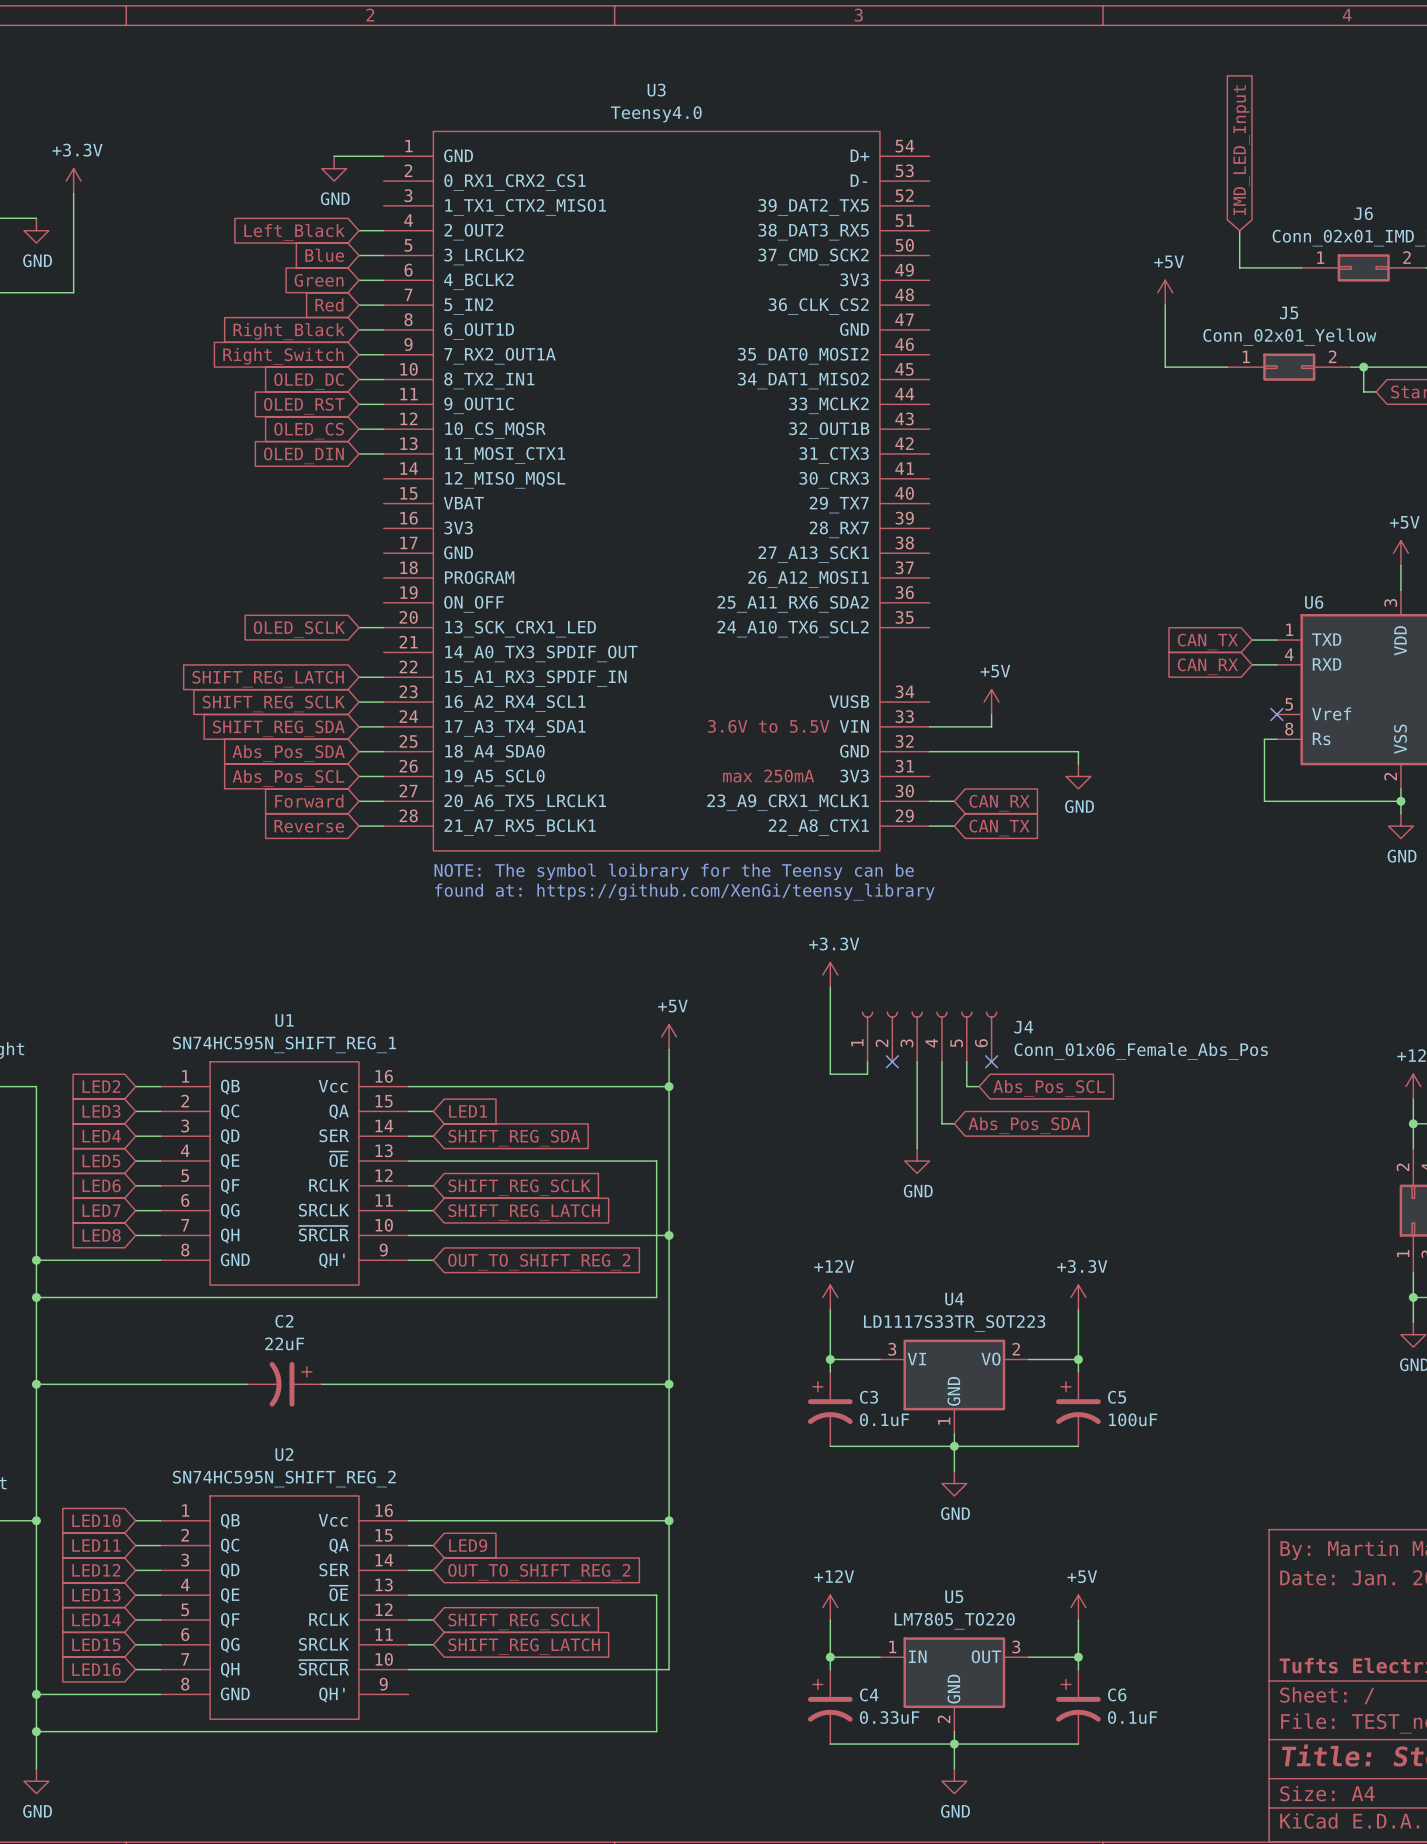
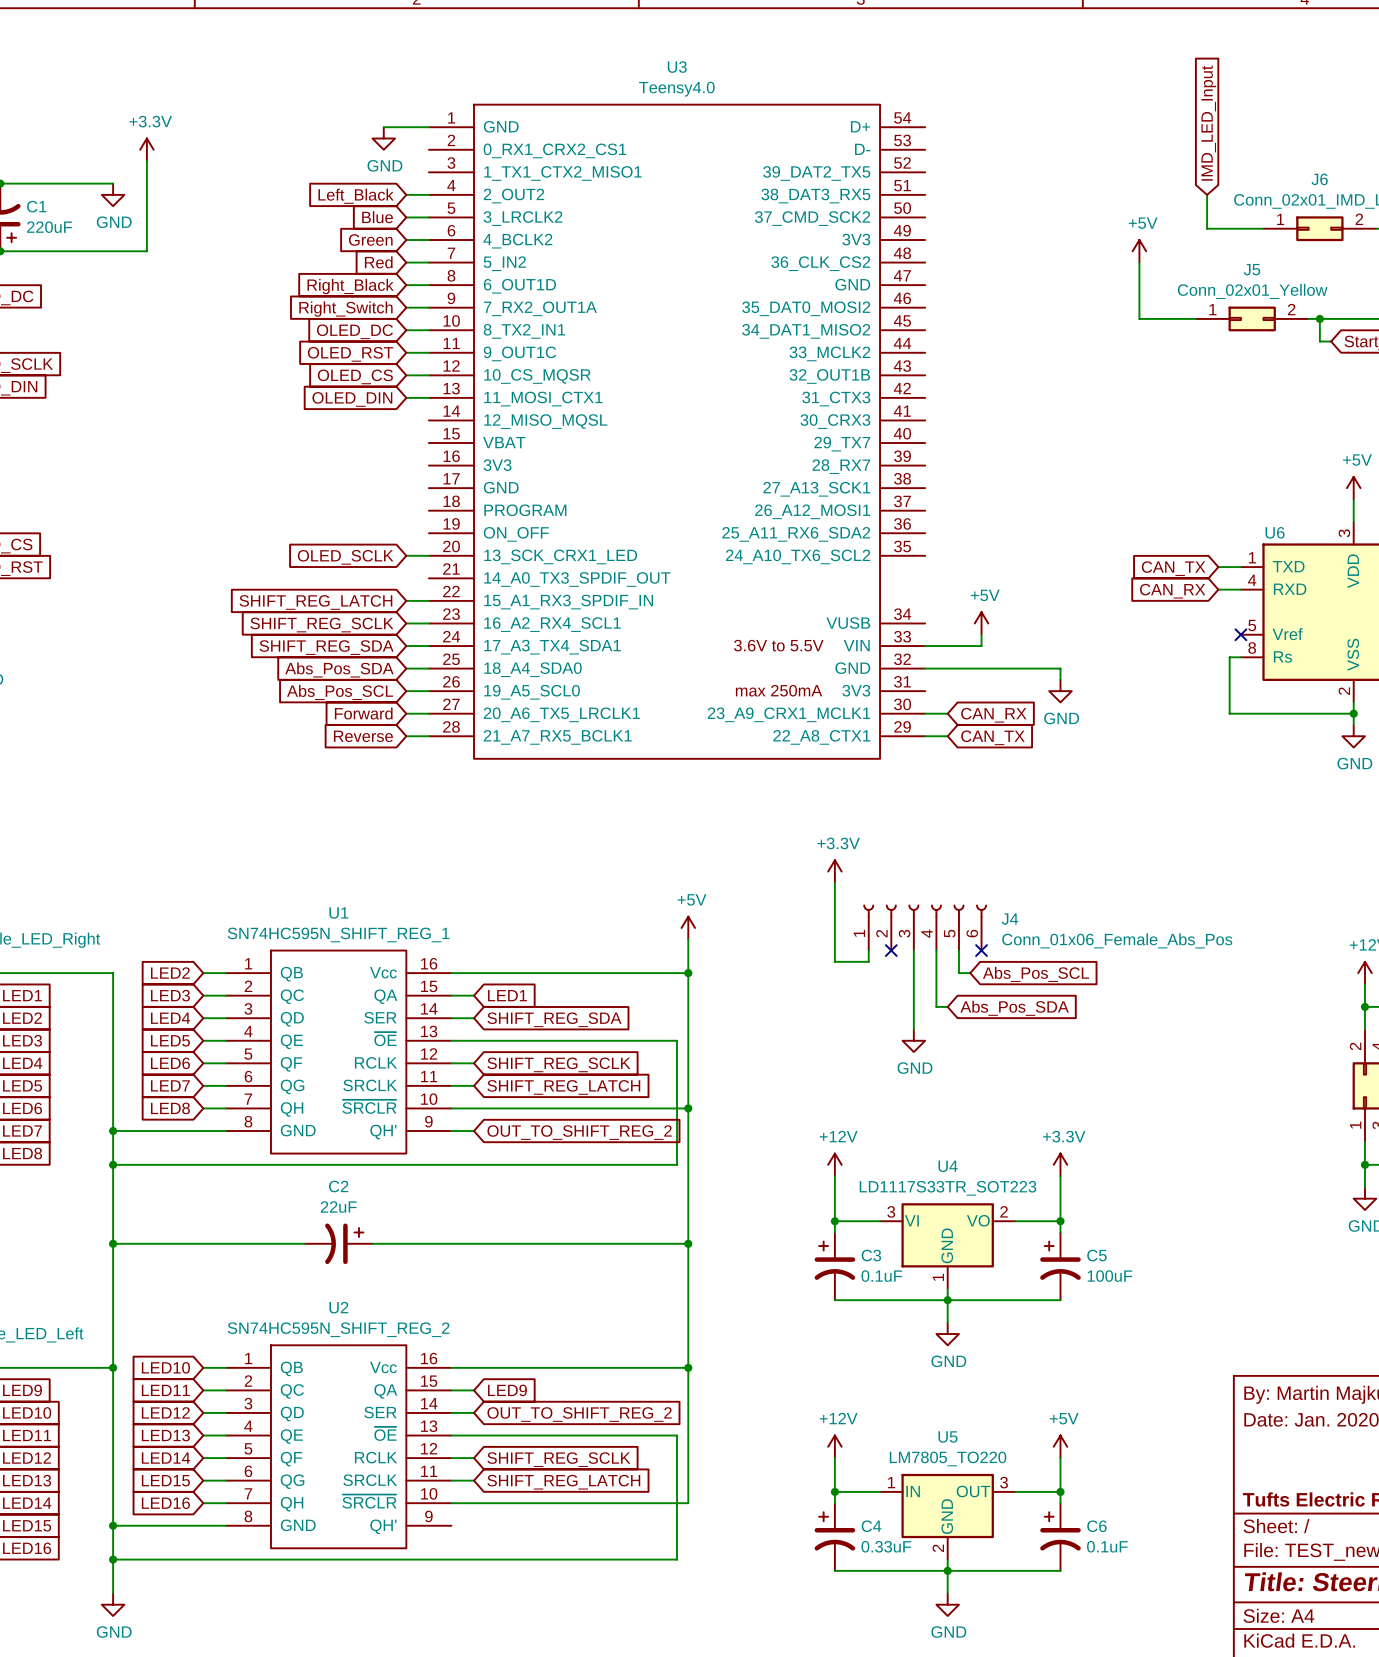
text: NOTE: The symbol loibrary for the Teensy can be (674, 871) -> none
text: found at: https://github.com/XenGi/teensy_library (684, 892) -> none

